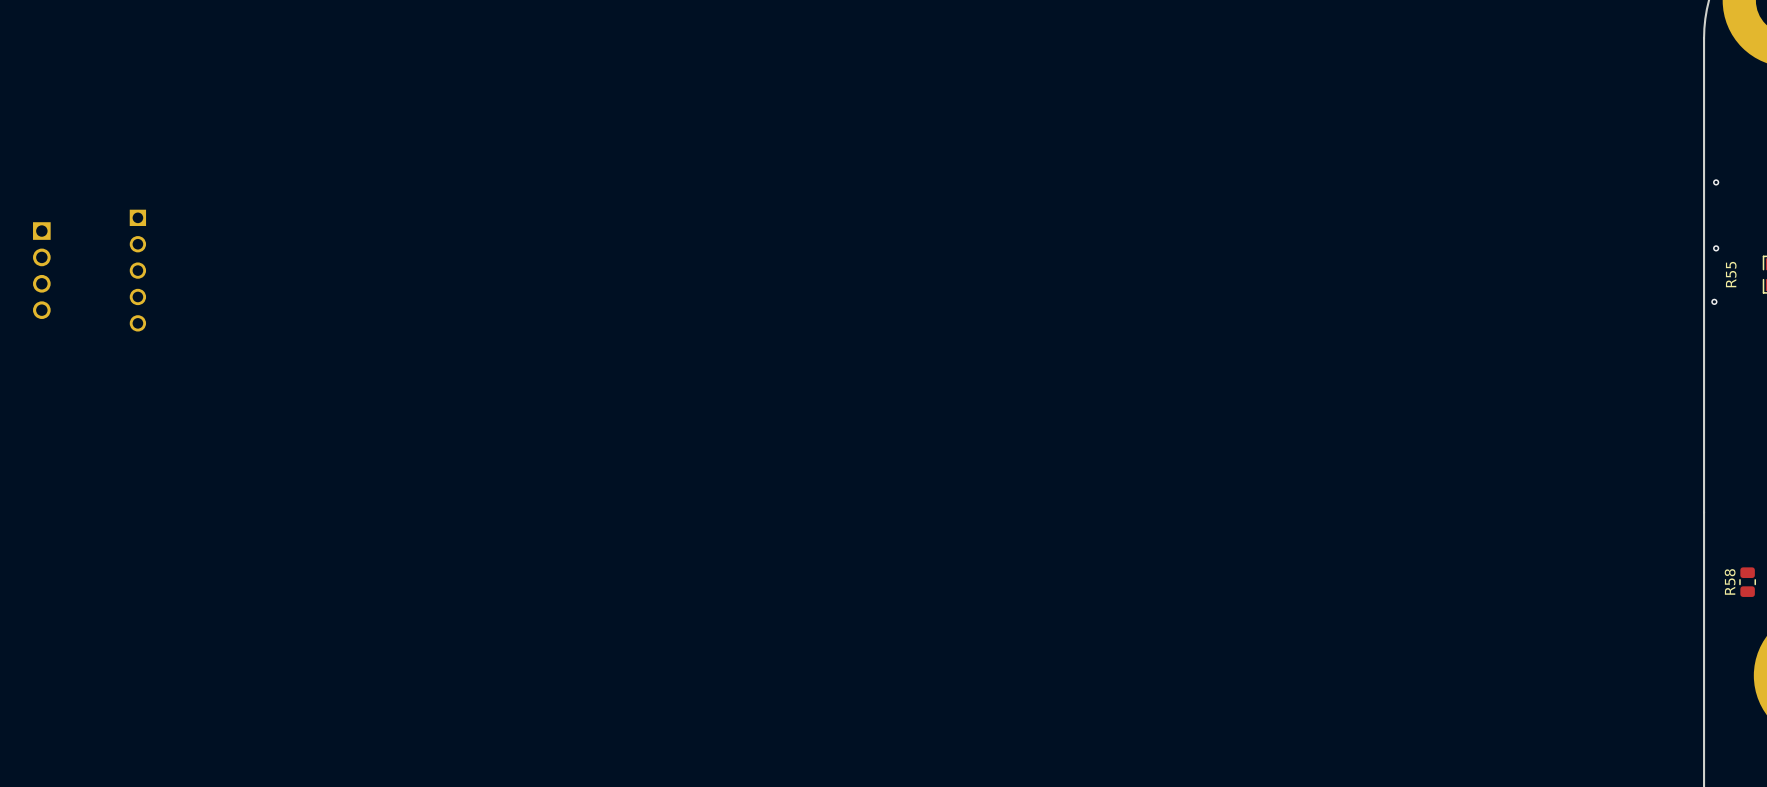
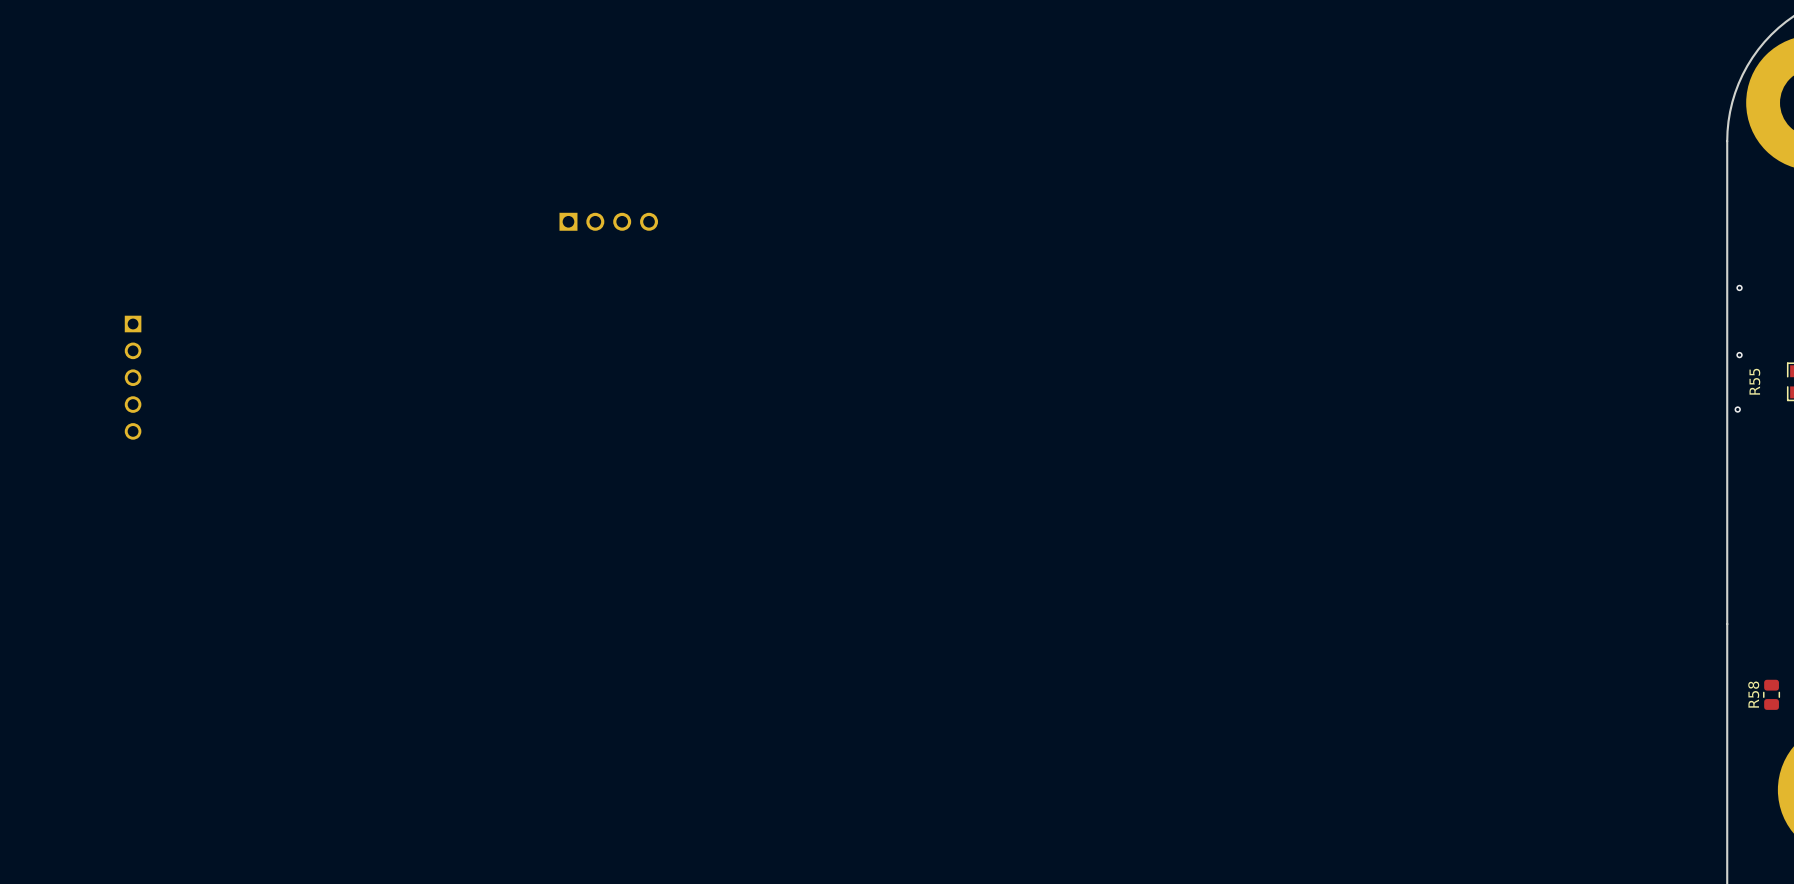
part: none -> (608, 221)
part: (41, 270) -> none

